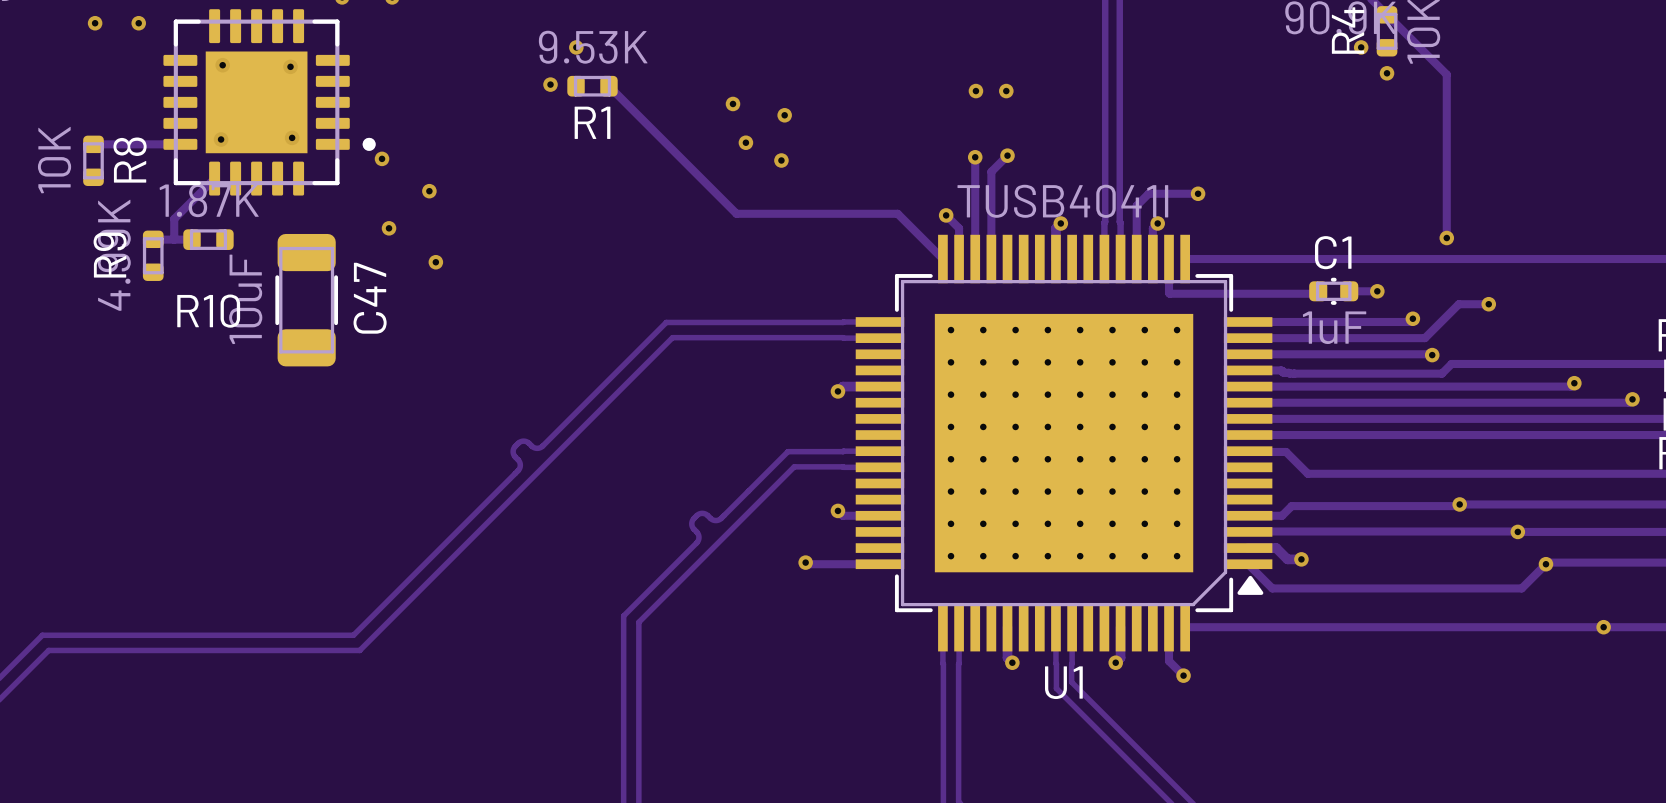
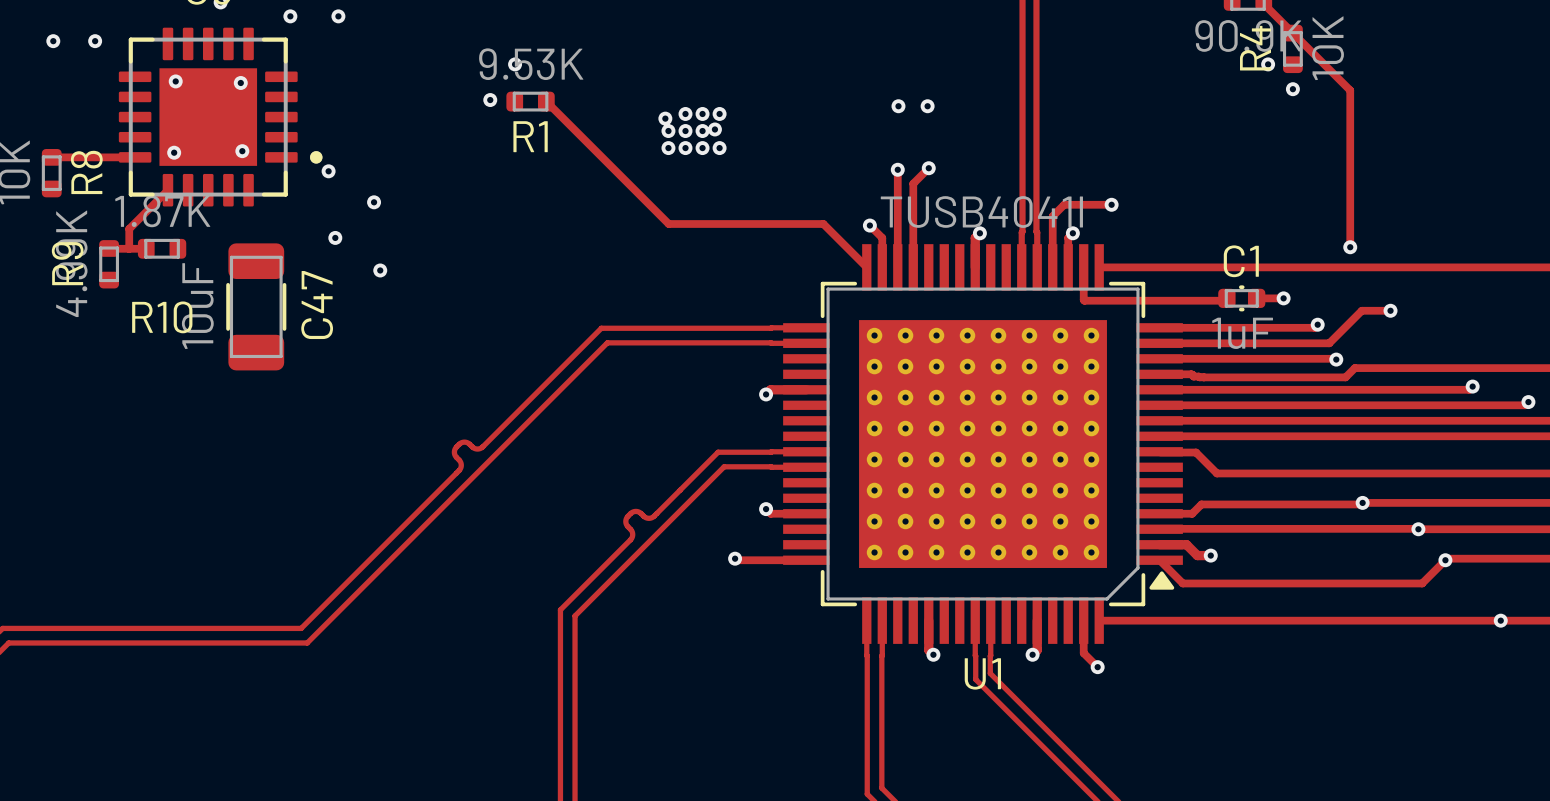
via: none -> (685, 113)
via: none -> (702, 113)
via: none -> (719, 113)
via: none -> (668, 131)
via: none -> (685, 131)
via: none -> (702, 131)
via: none -> (668, 148)
via: none -> (685, 148)
via: none -> (702, 148)
via: none -> (719, 148)
via: (745, 142) -> none
via: (781, 160) -> none

